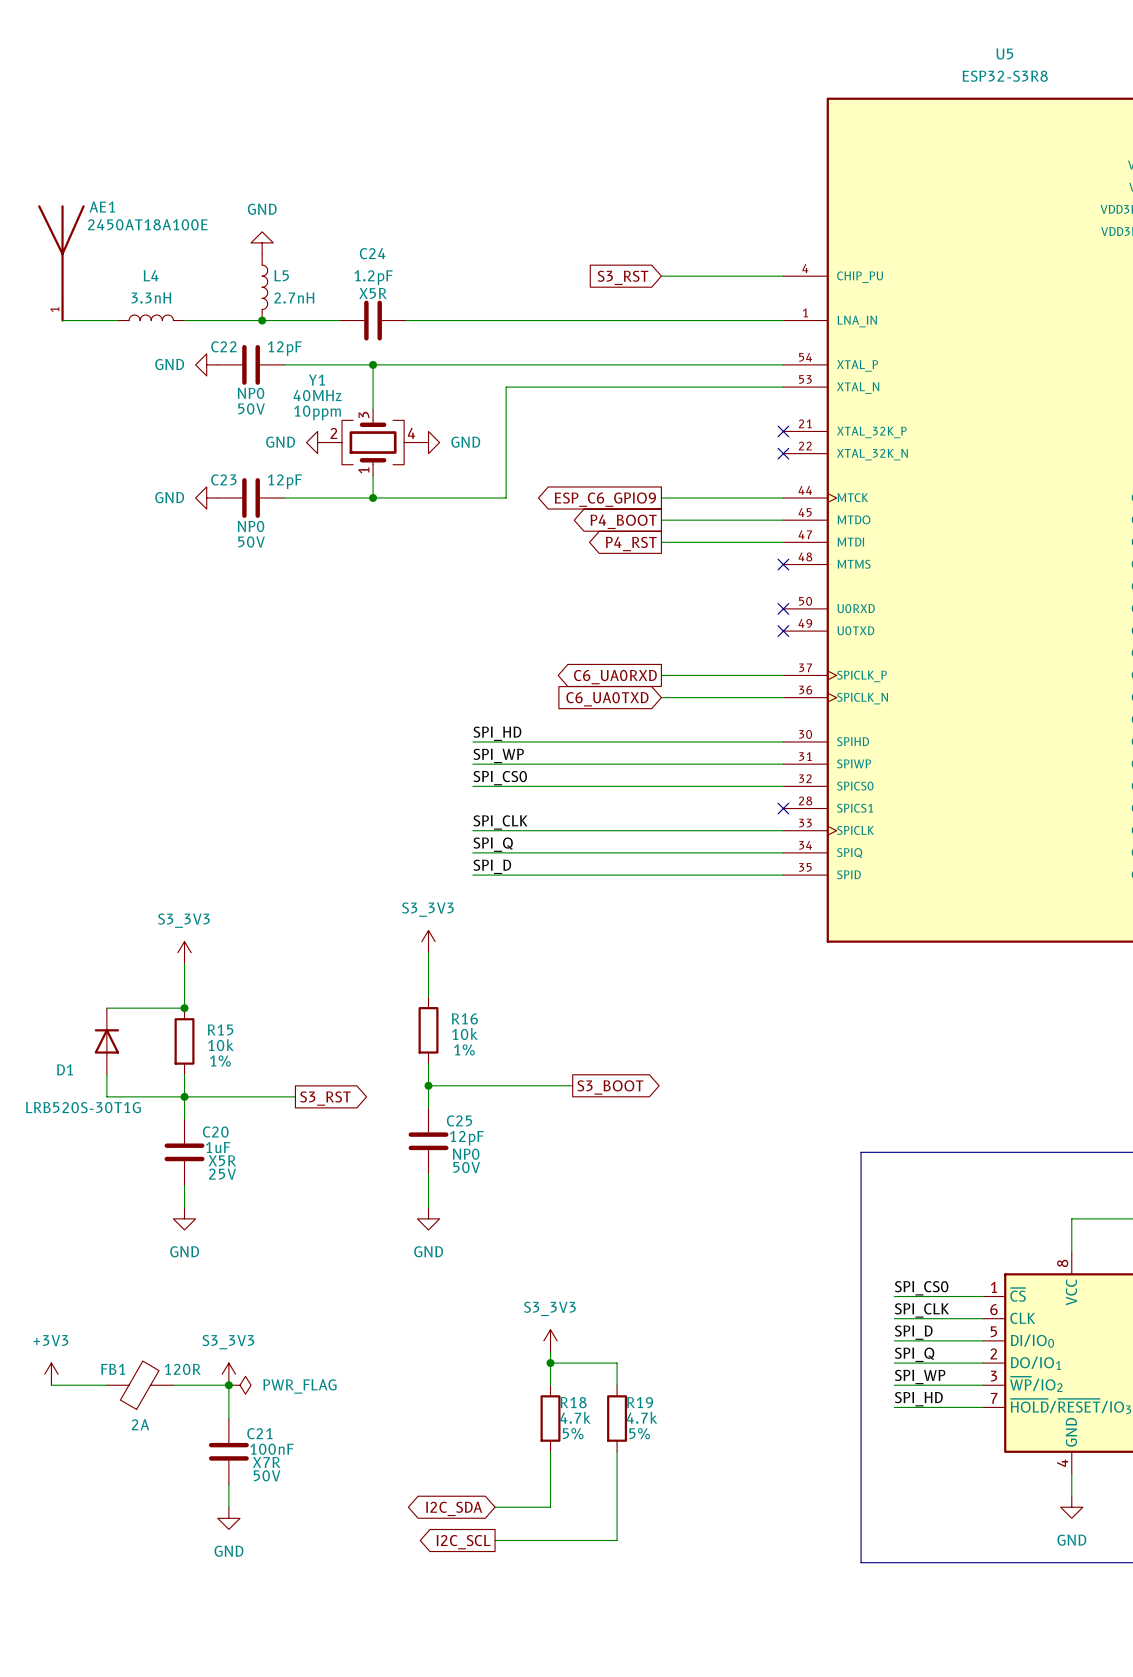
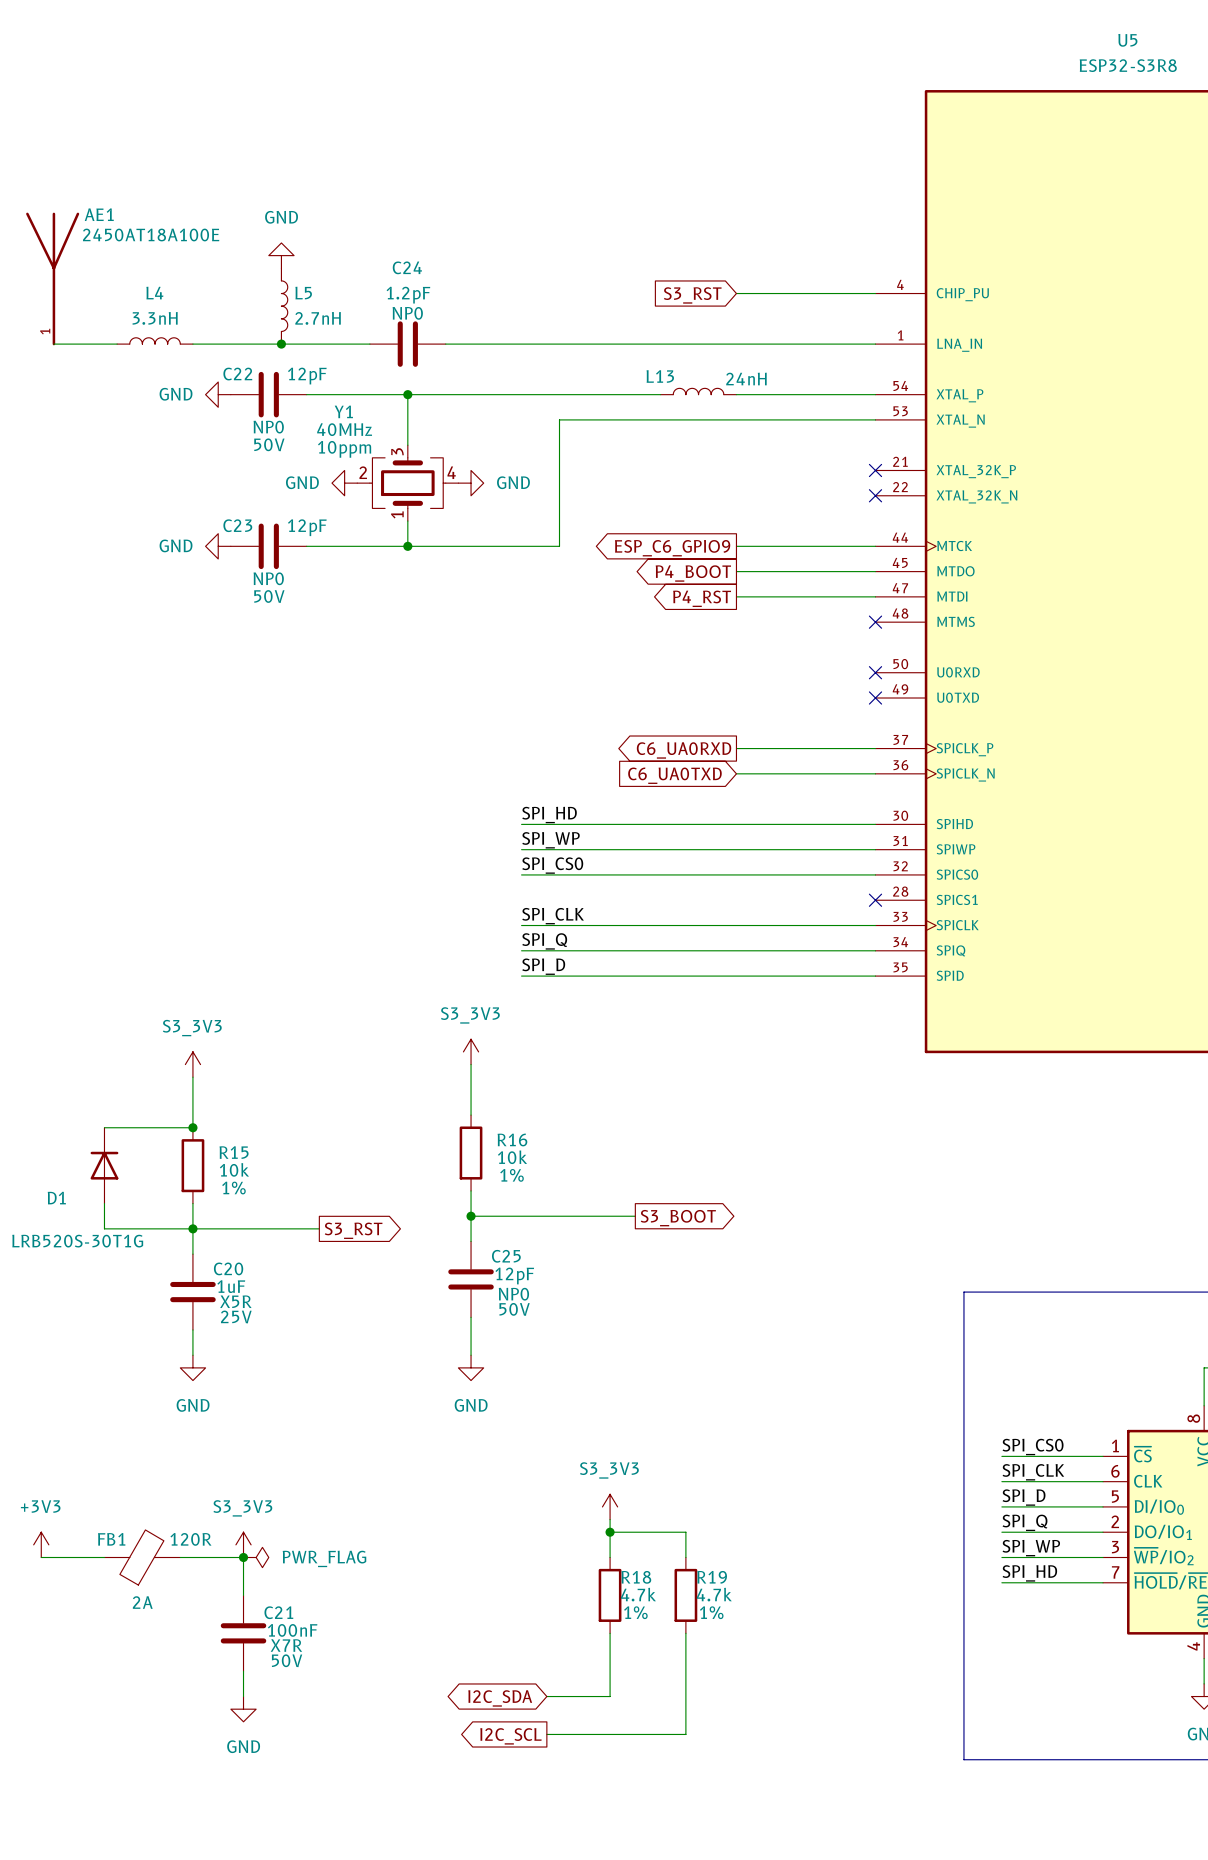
C24 text: X5R (373, 293) -> NP0 (407, 313)
L13: none -> 24nH (698, 391)
wire: (594, 364) (661, 364) -> none
R18 text: 5% (573, 1433) -> 1% (635, 1612)
R19 text: 5% (639, 1433) -> 1% (711, 1612)

